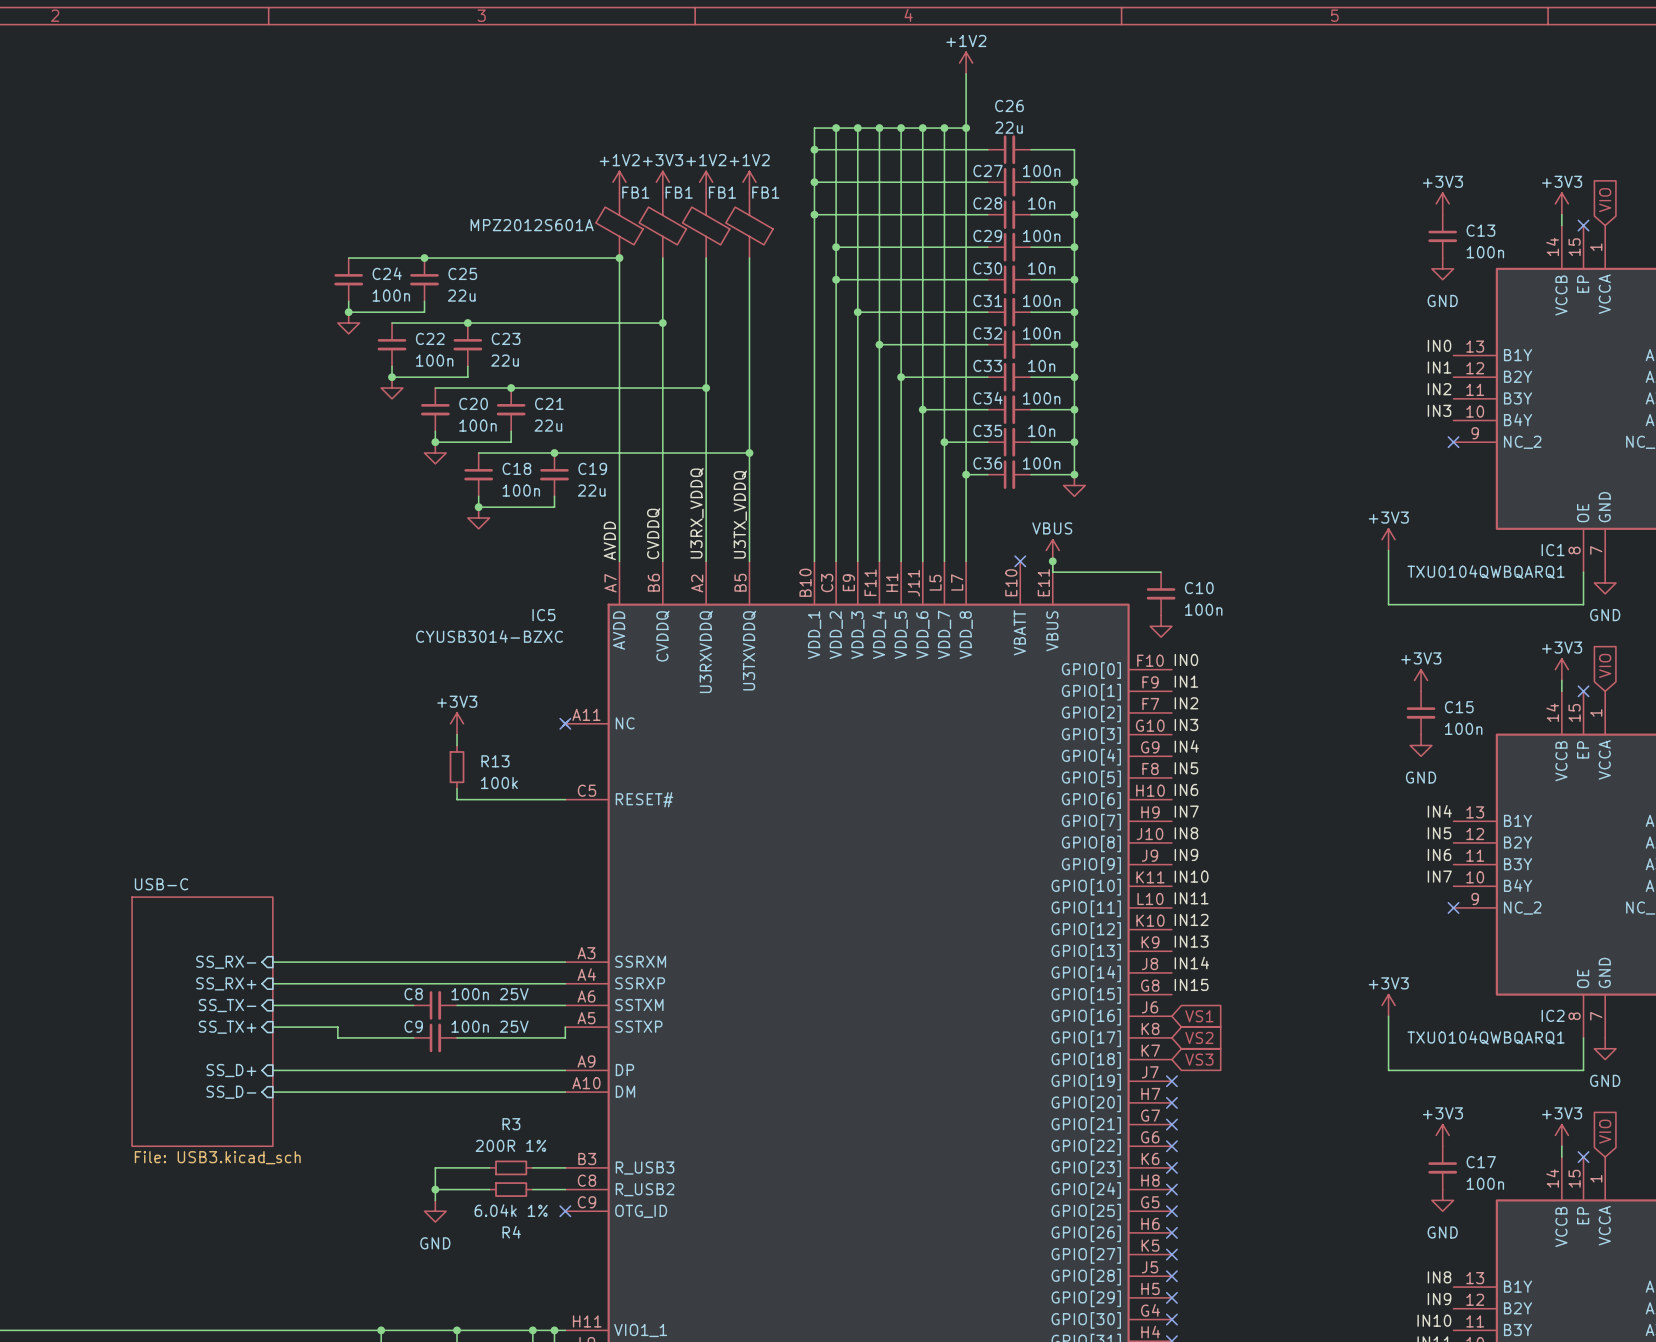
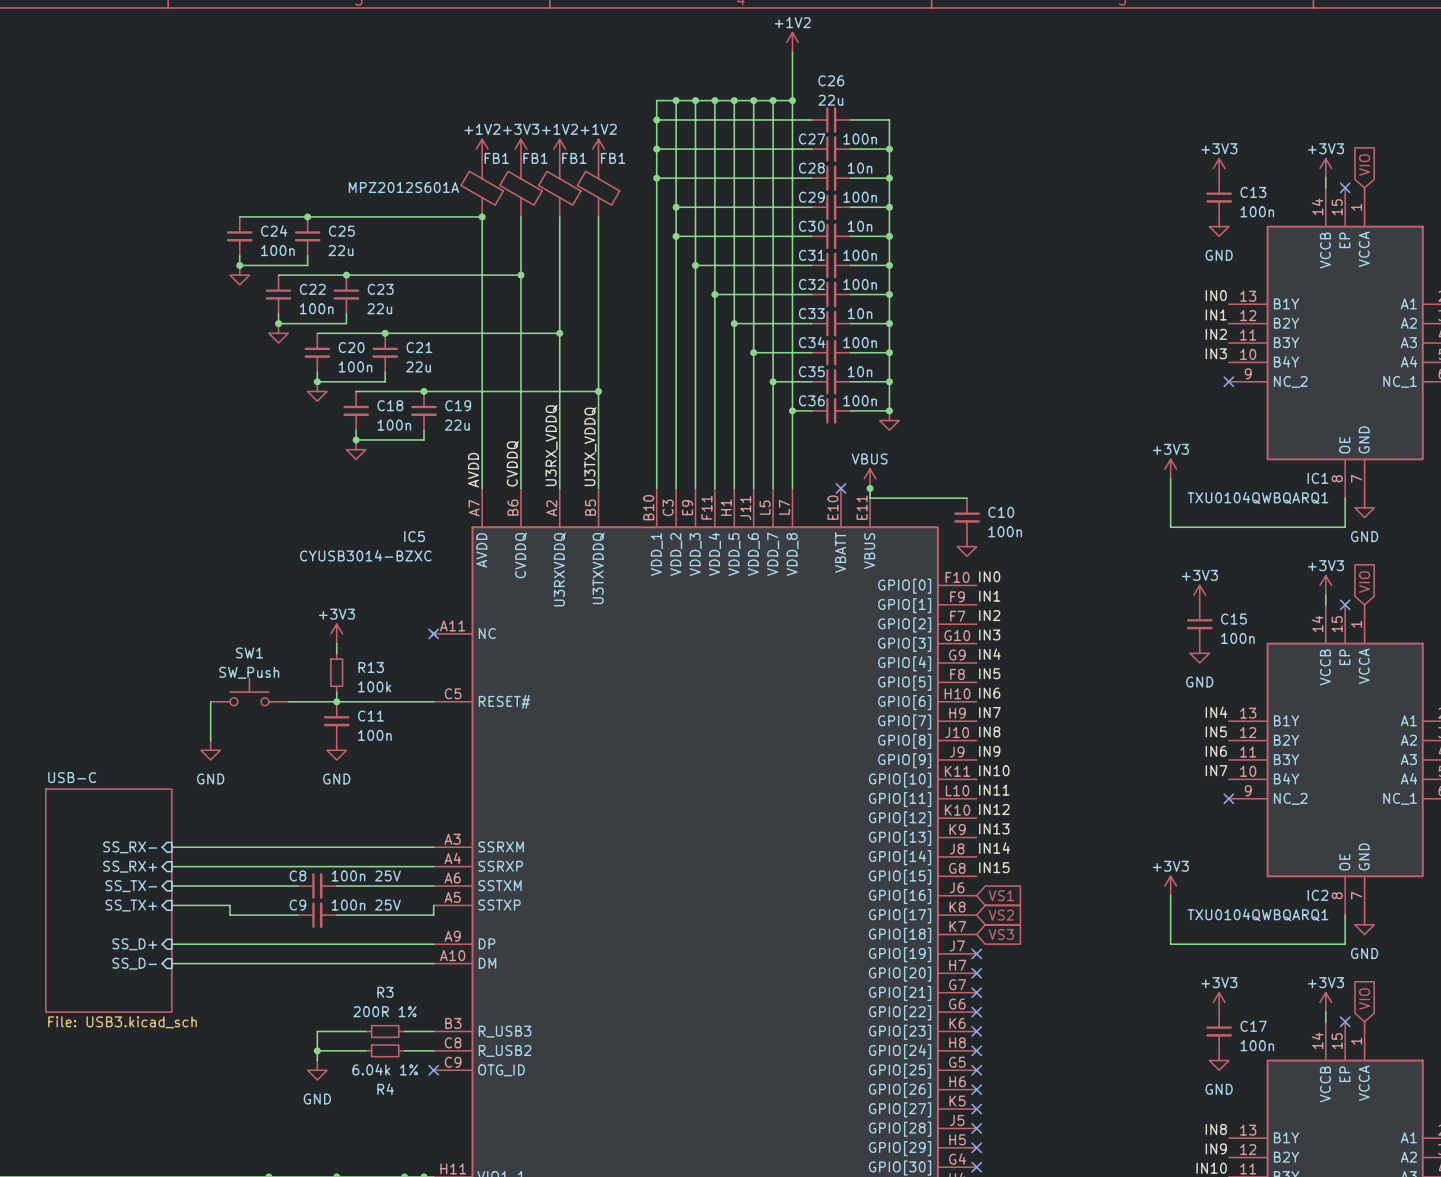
SW1: none -> SW_Push (249, 692)
wire: none -> (210, 701) (210, 740)
wire: none -> (288, 701) (336, 701)
junction: none -> (336, 701)
C11: none -> 100n (336, 721)
power symbol: none -> GND (210, 750)
power symbol: none -> GND (336, 750)

